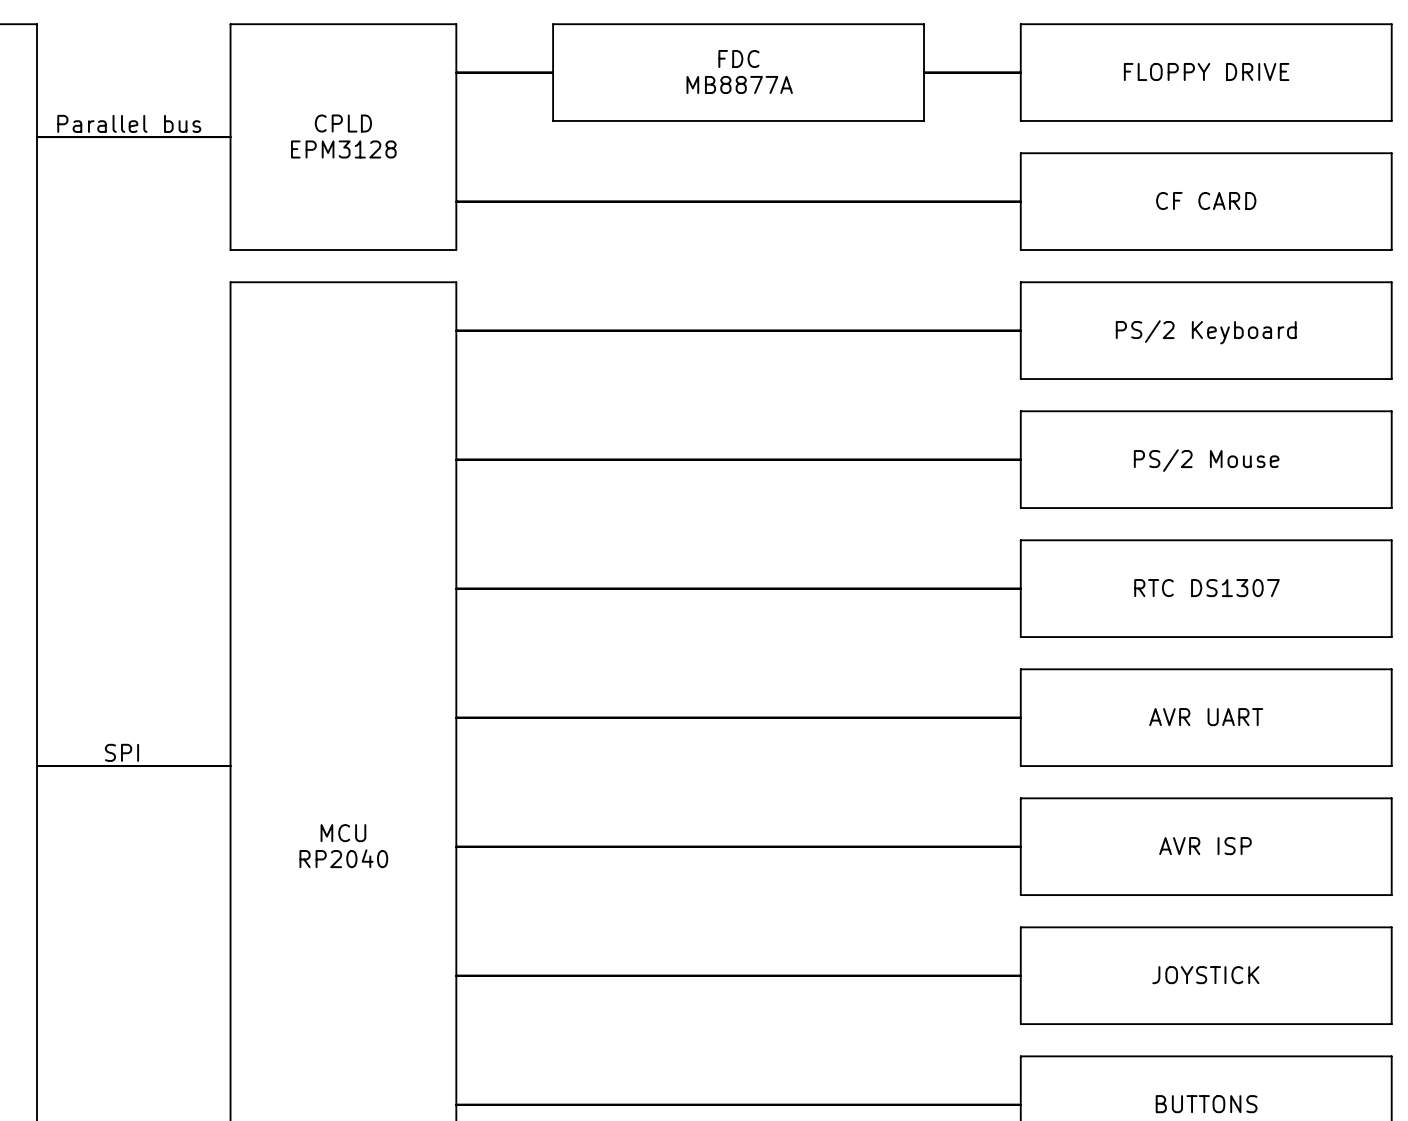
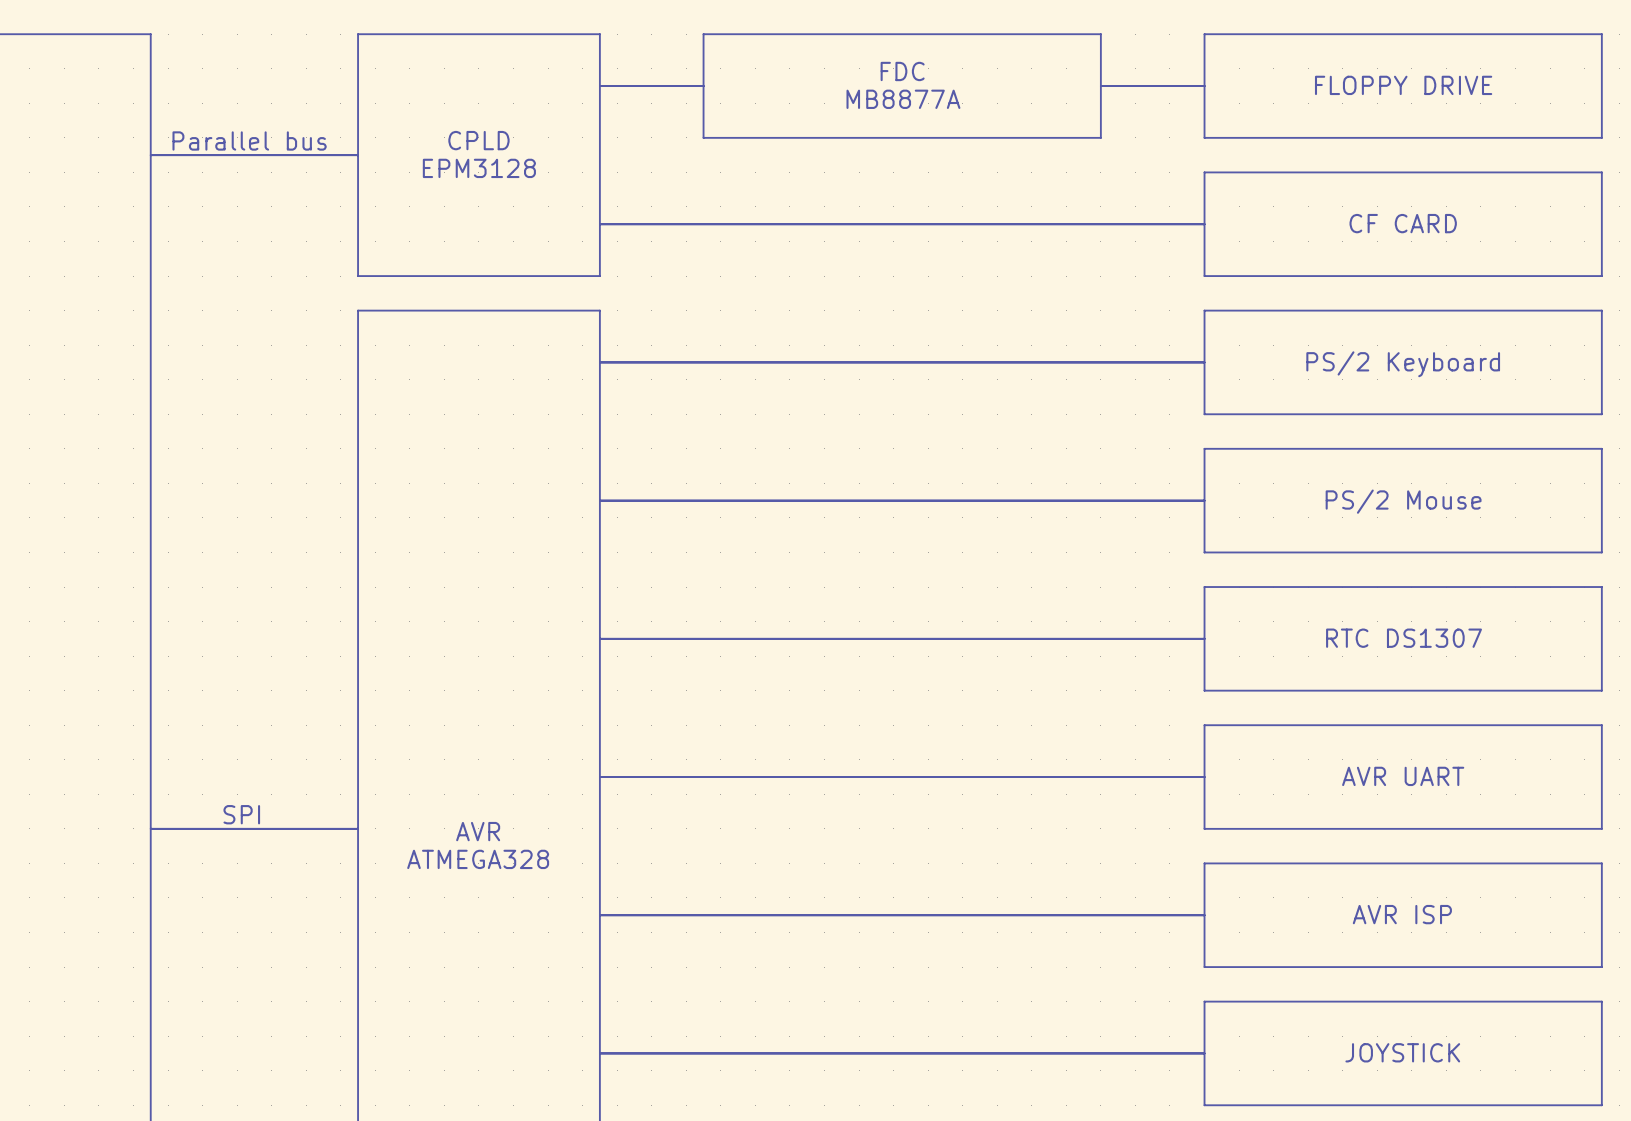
text: none -> AVR (478, 831)
text: none -> ATMEGA328 (478, 859)
text: MCU (343, 833) -> none
text: RP2040 (343, 858) -> none

